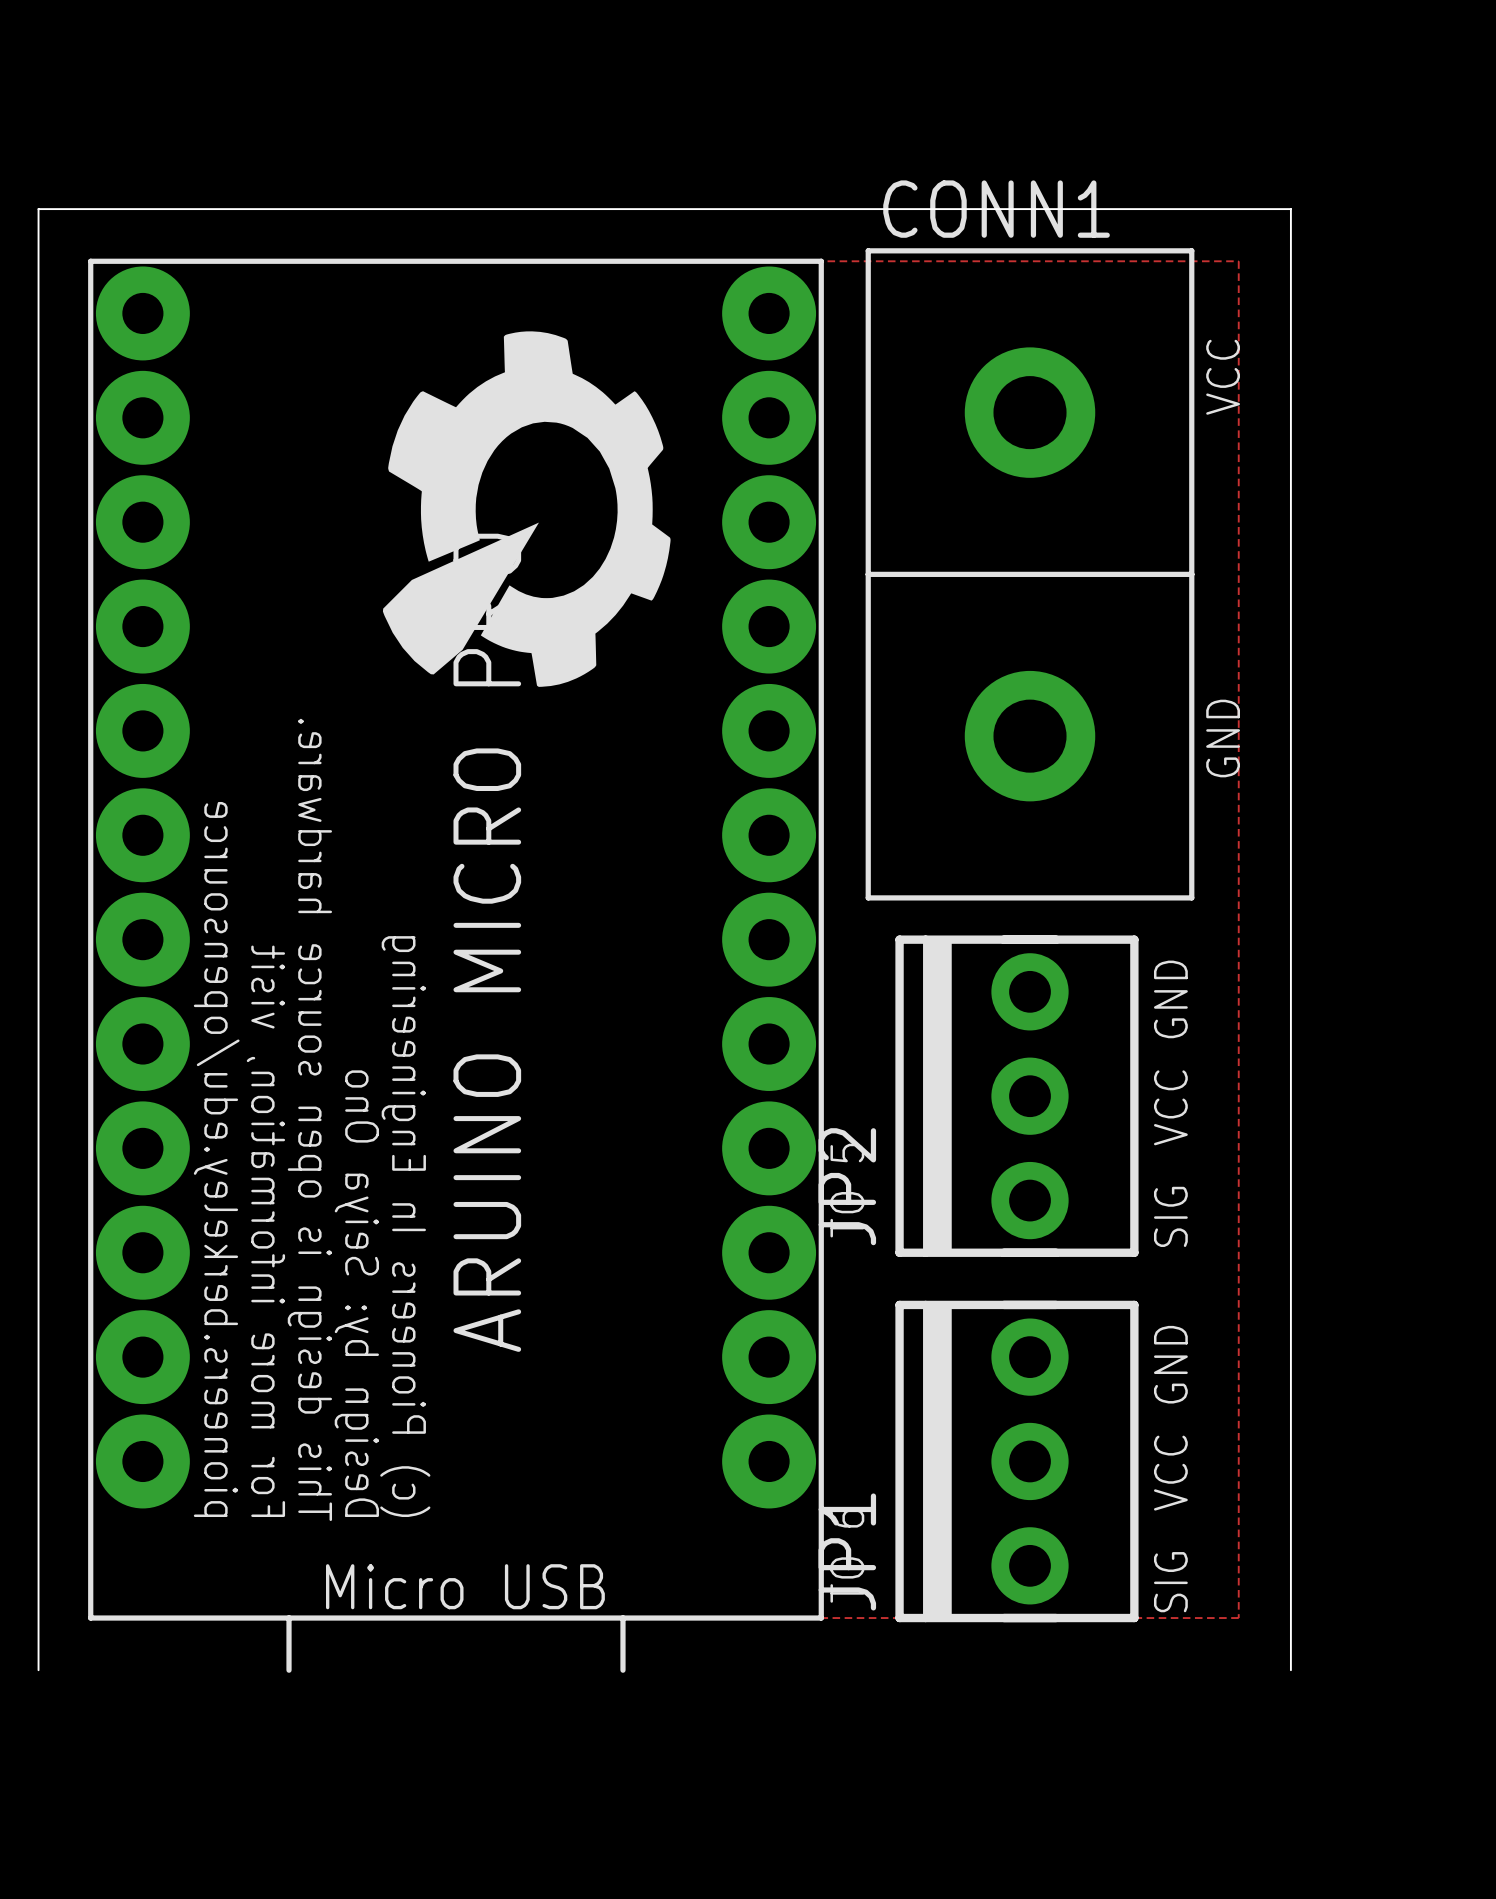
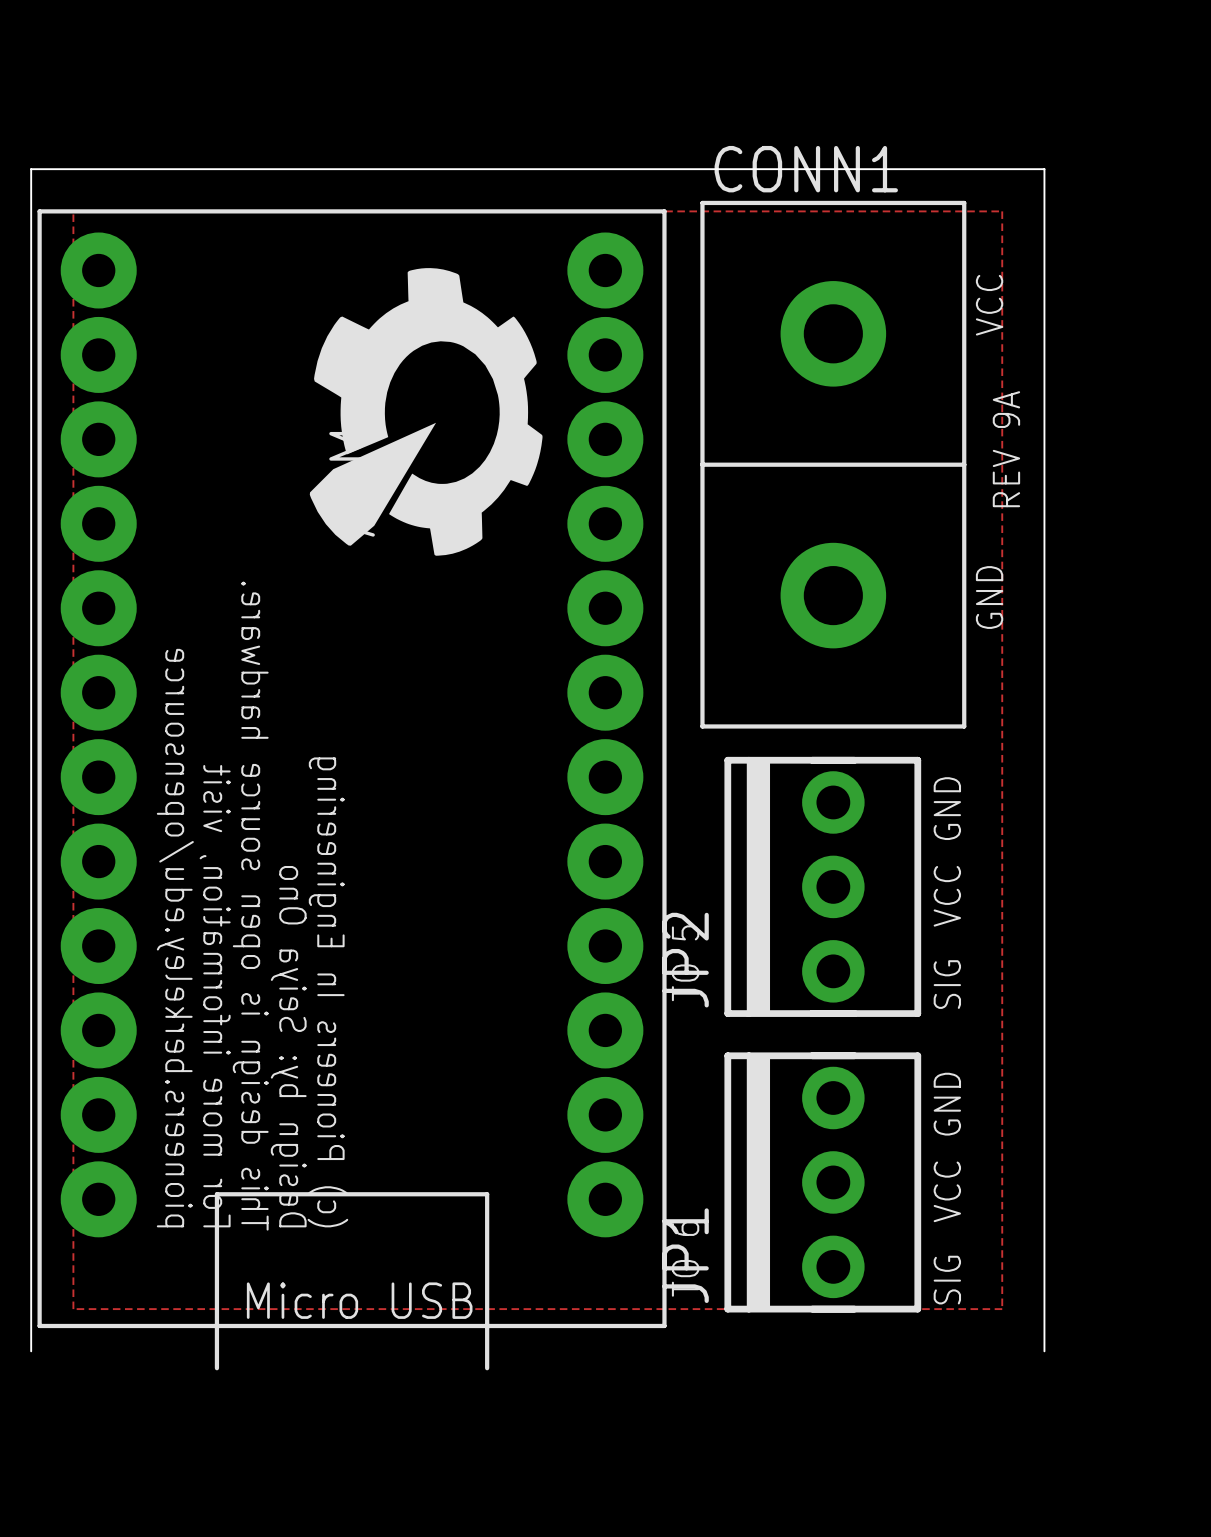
text: none -> REV 9A (1006, 449)
part: (456, 965) -> none
part: none -> (352, 789)

